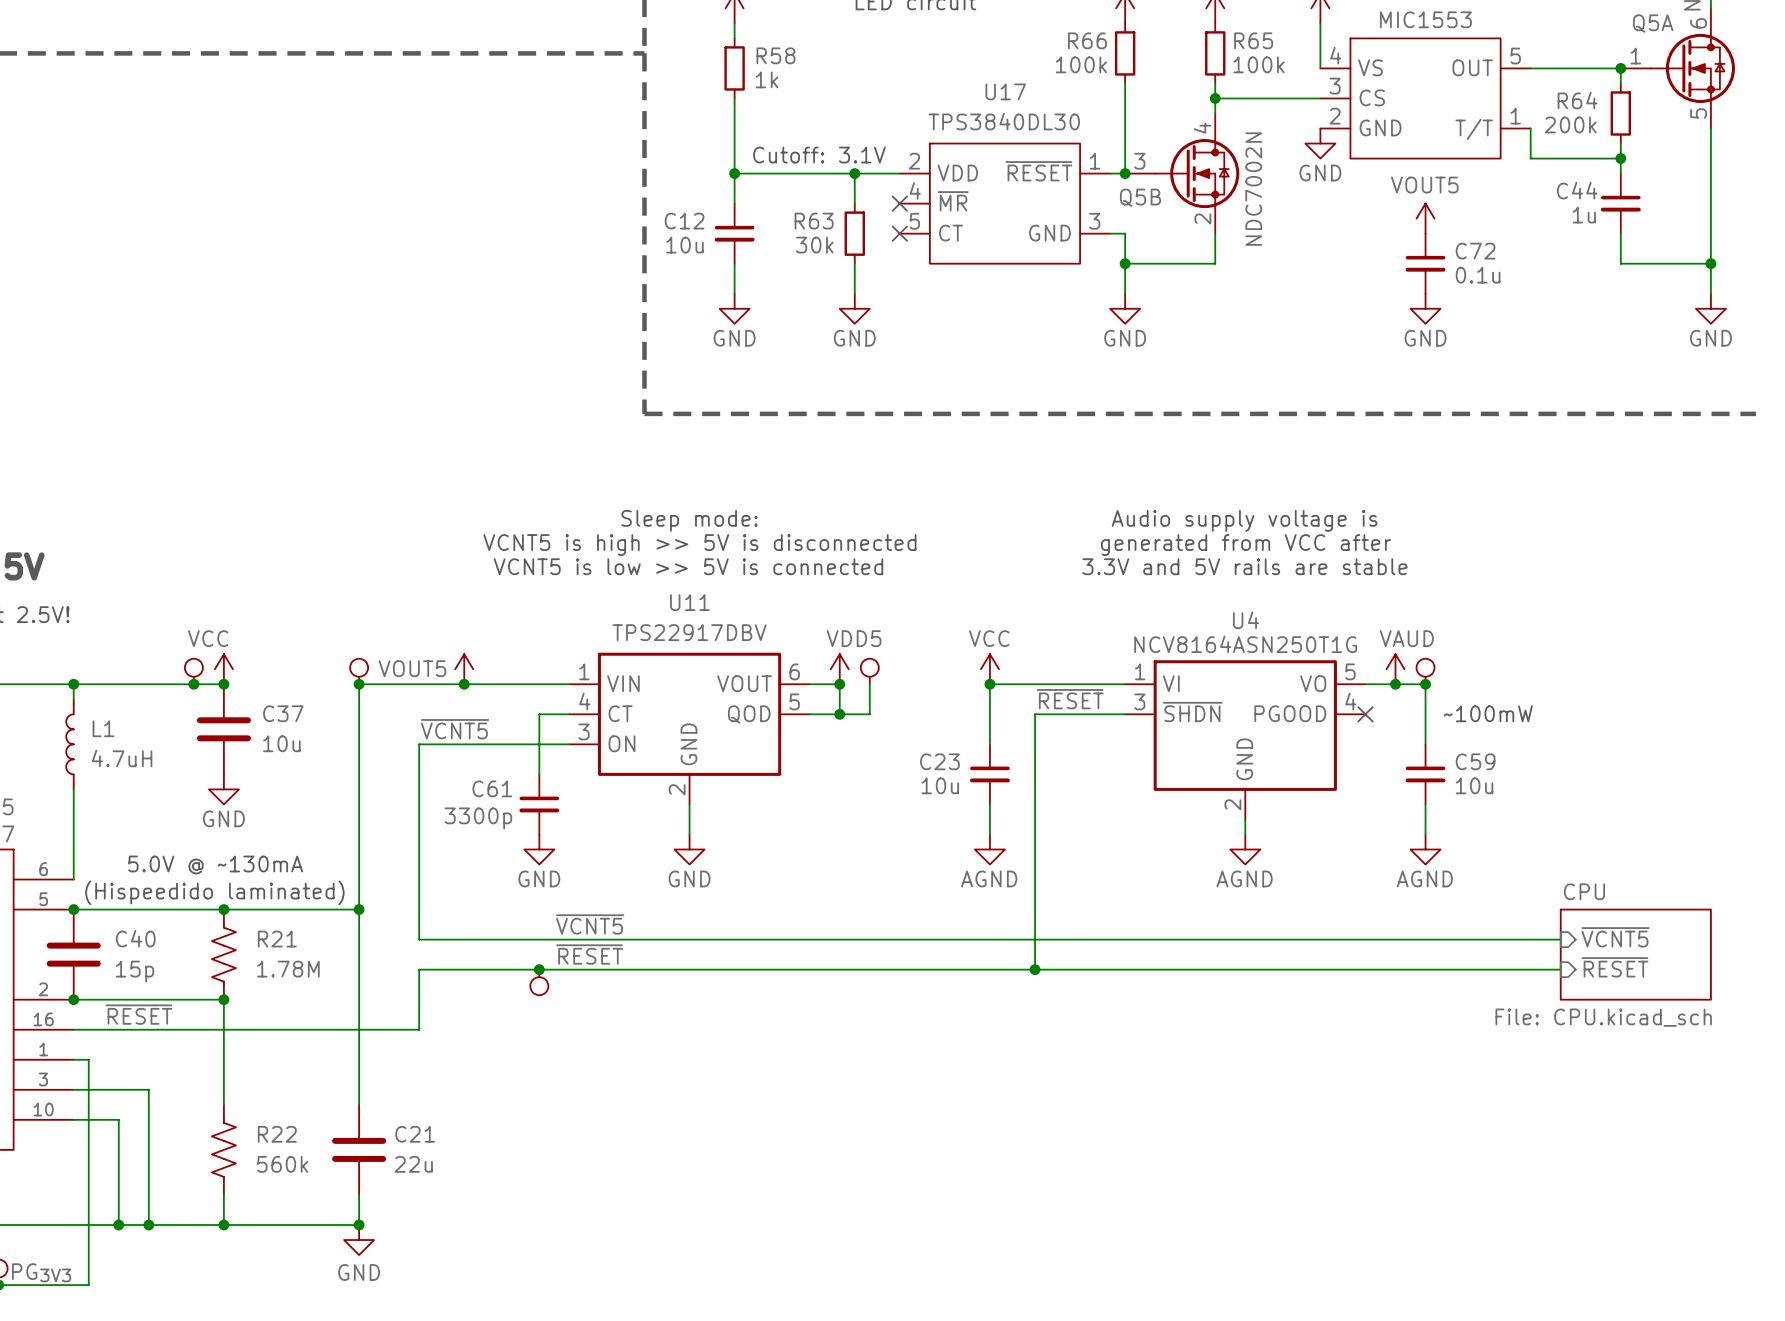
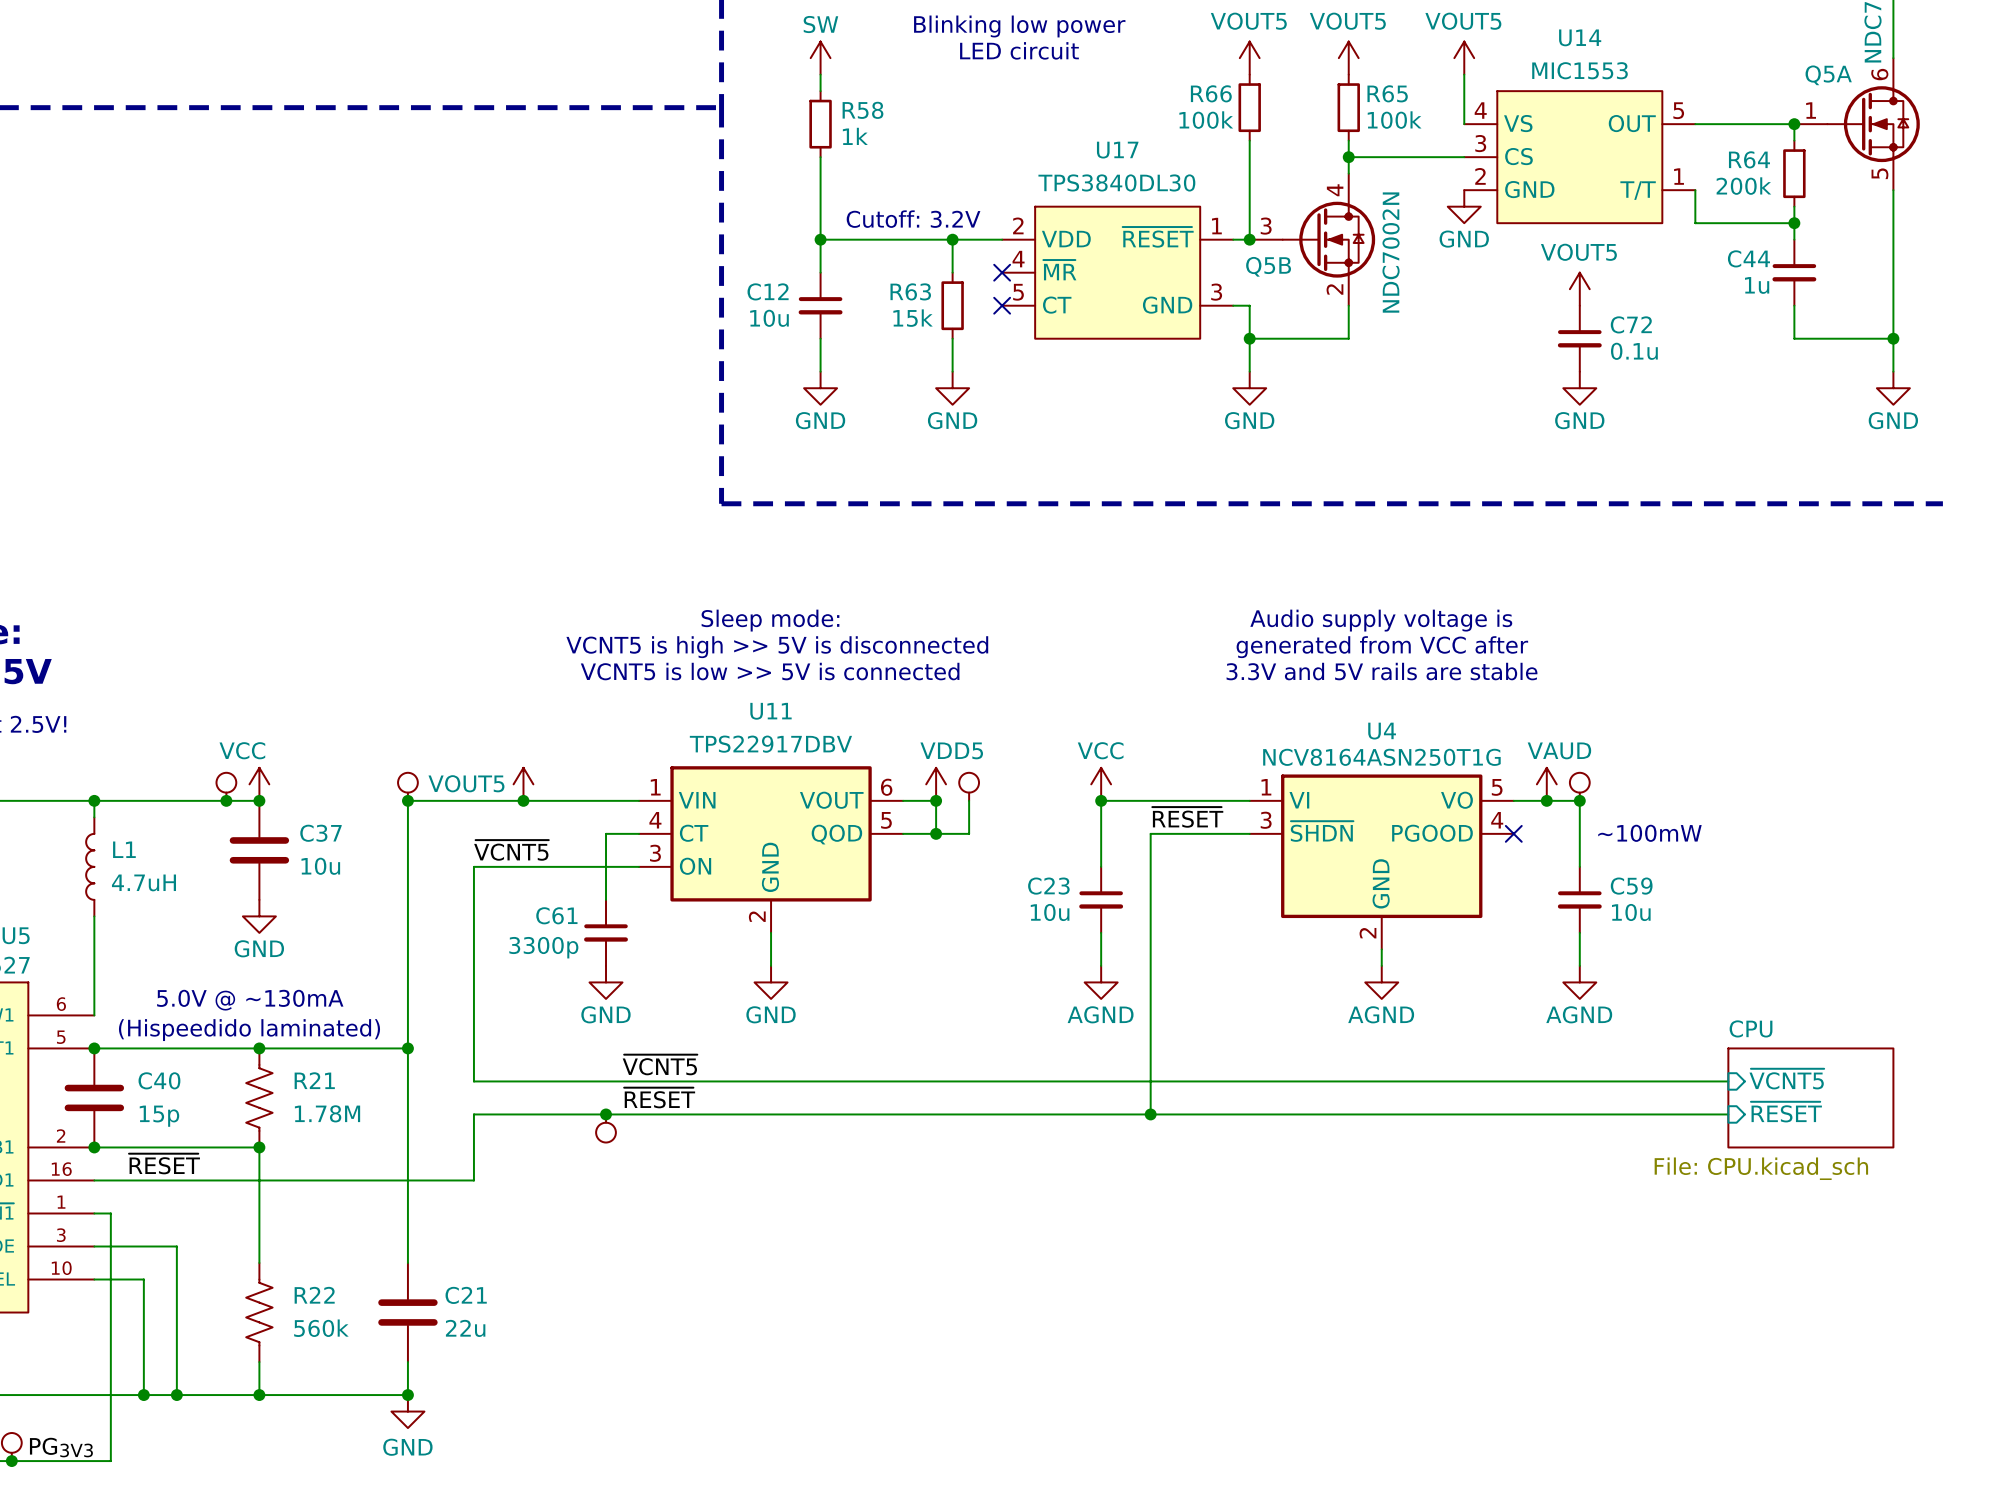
text: Cutoff: 3.1V (819, 155) -> Cutoff: 3.2V (913, 219)
R63 value: 30k (814, 245) -> 15k (913, 318)

